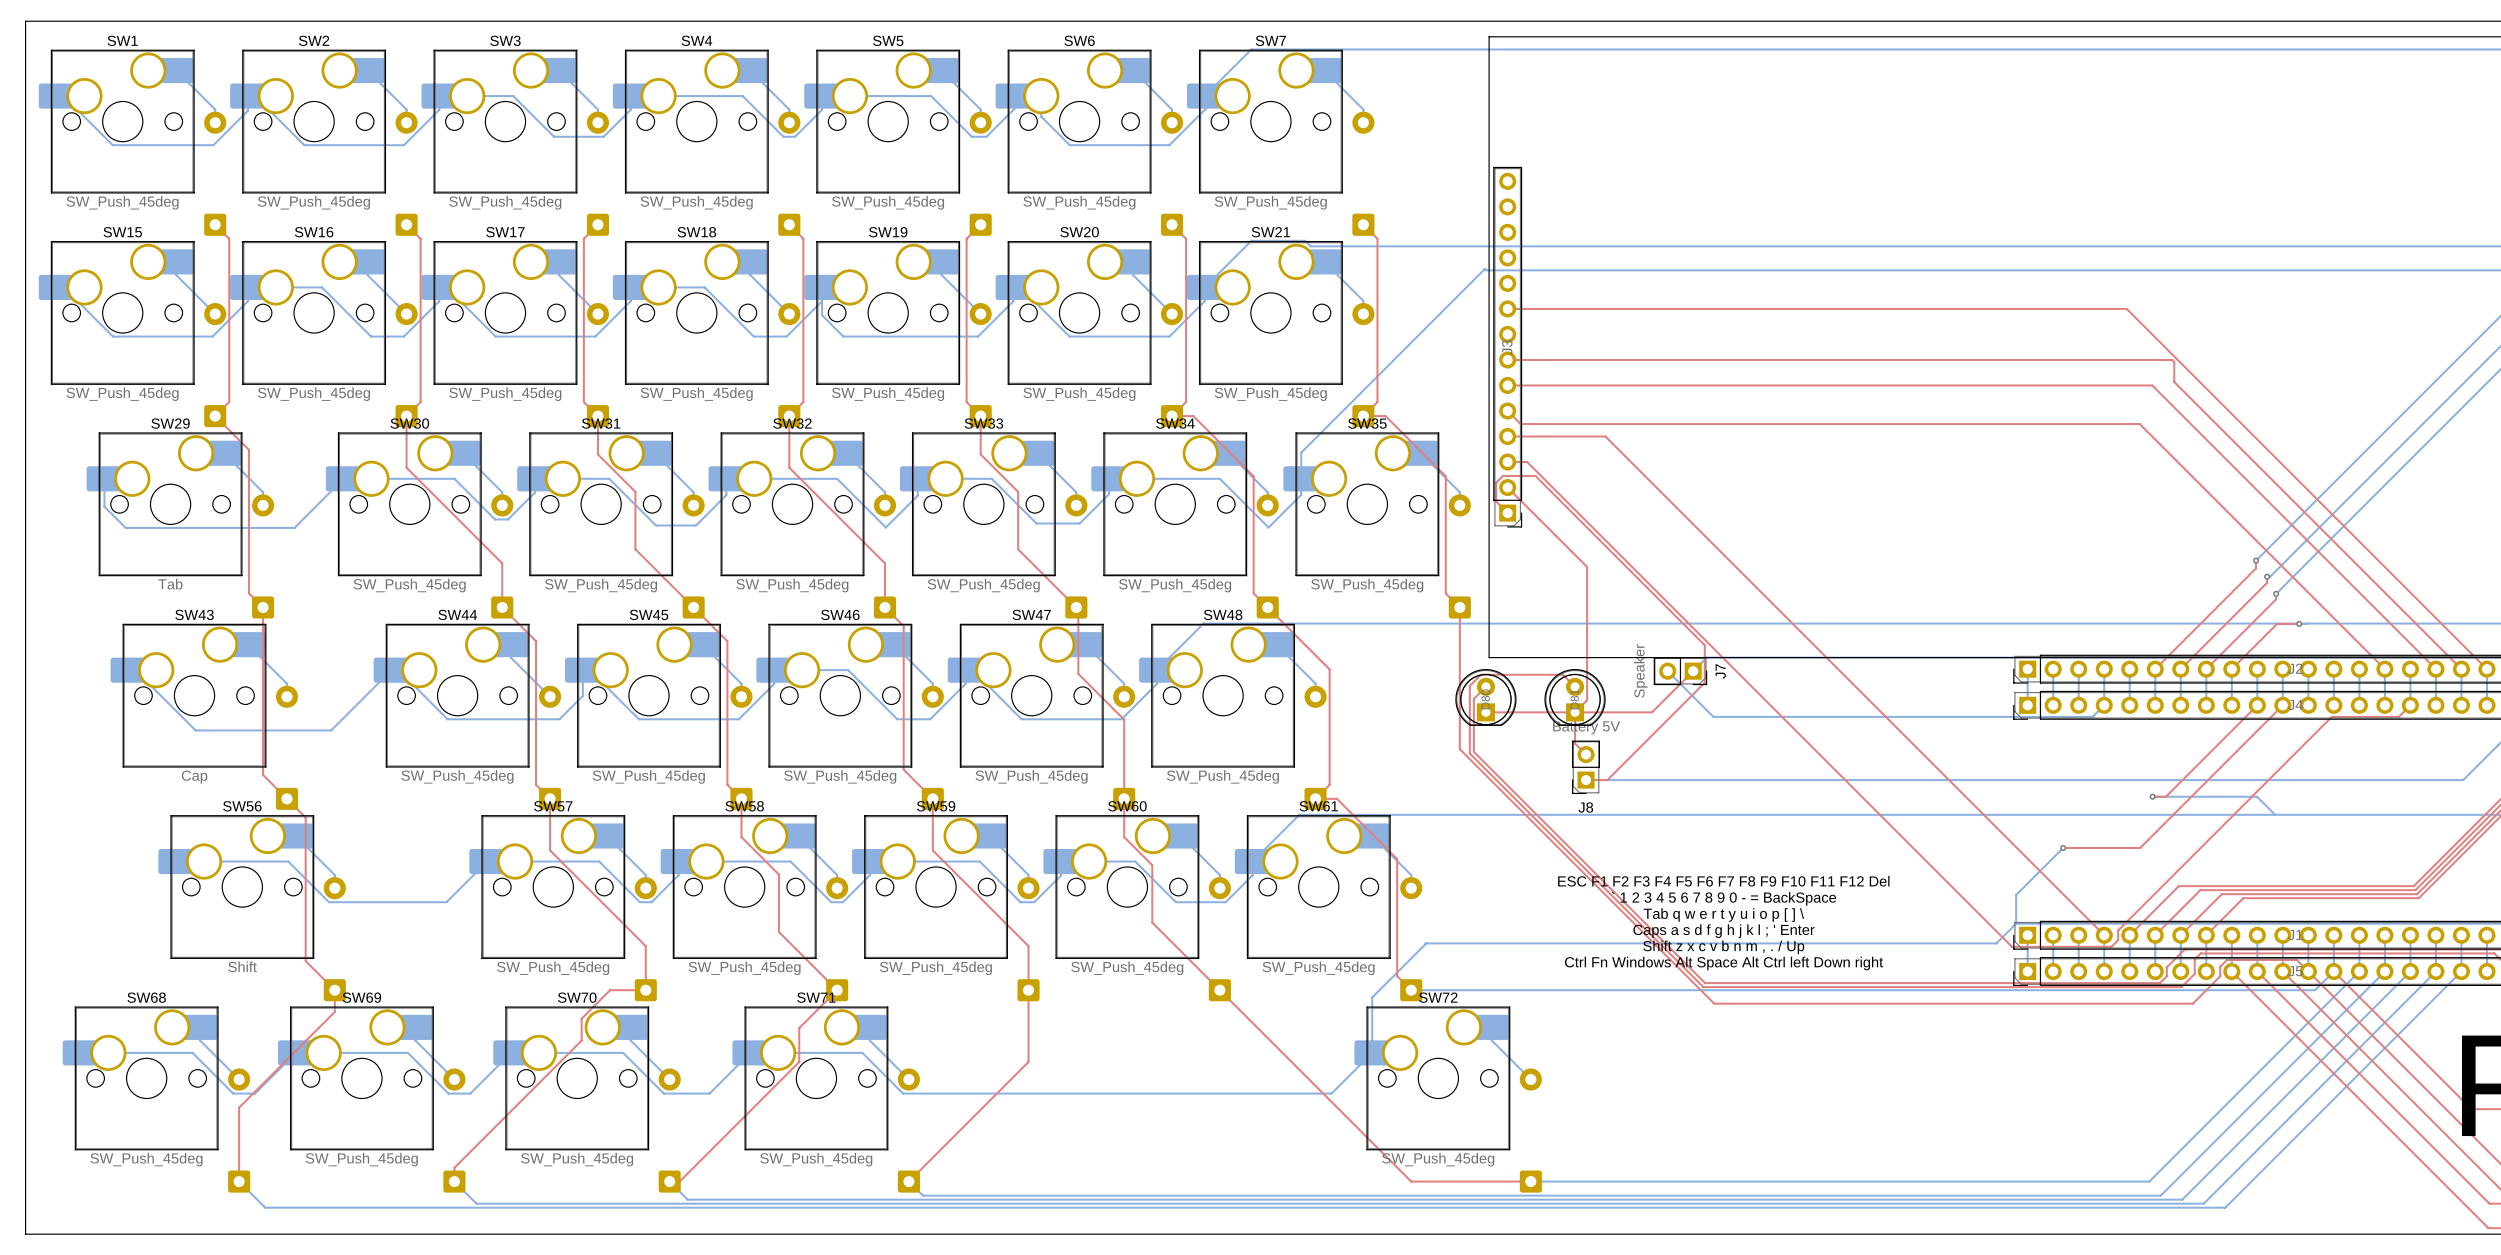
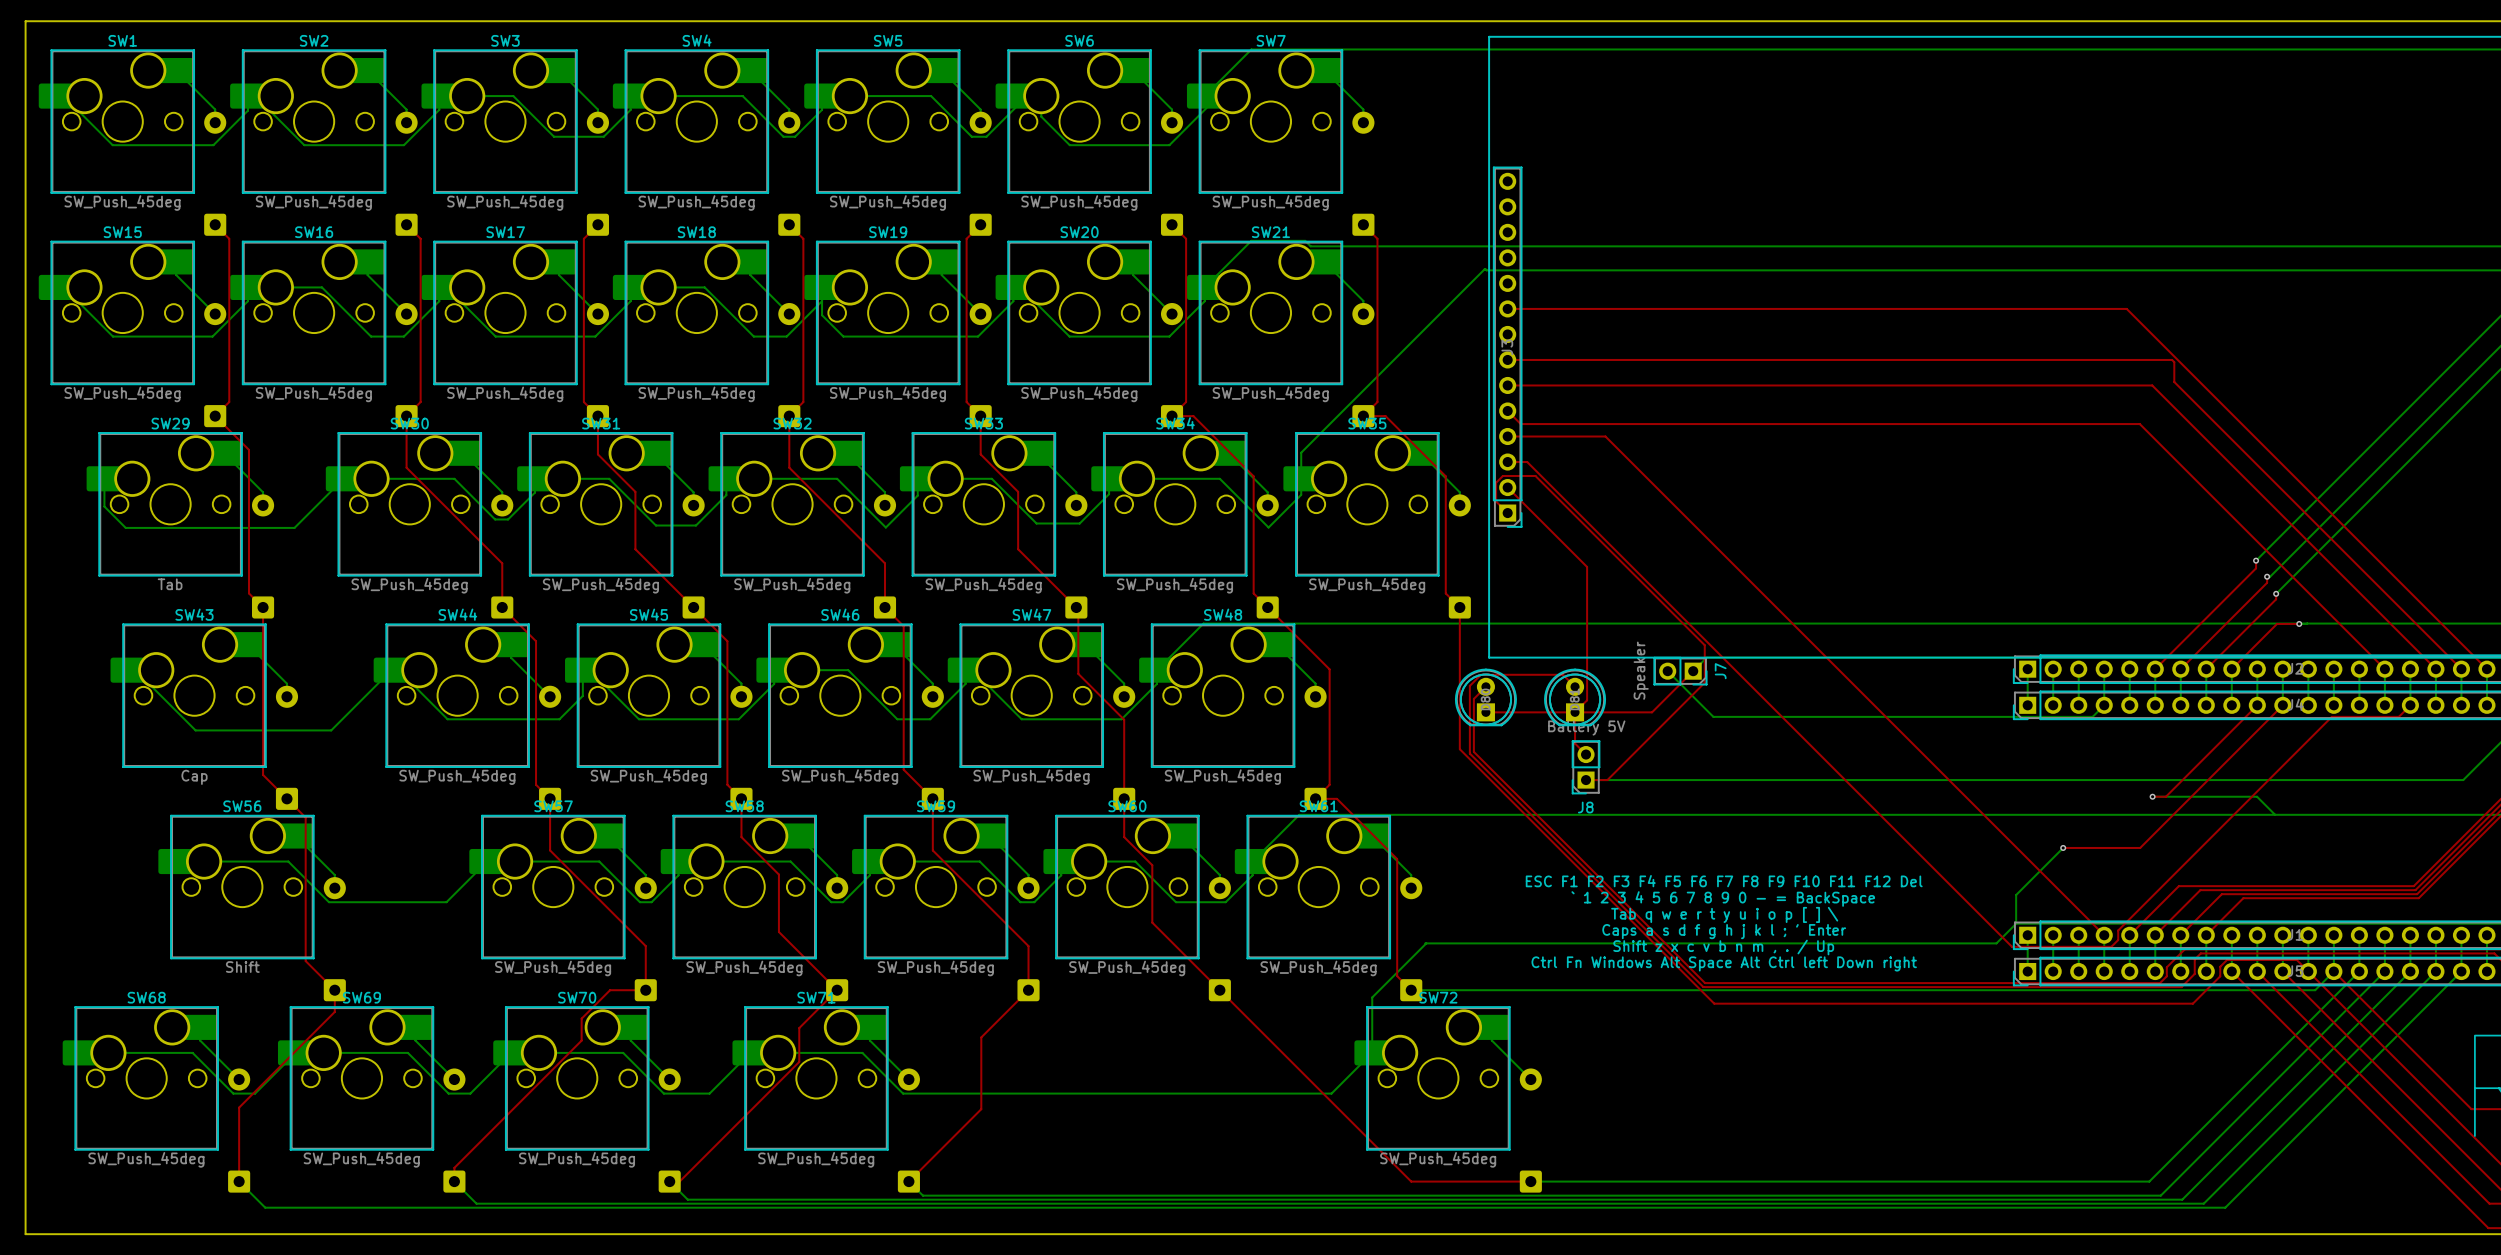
top track: (1028, 990) (1028, 1061) (981, 1109) -> (1028, 990) (981, 1037) (981, 1109)

